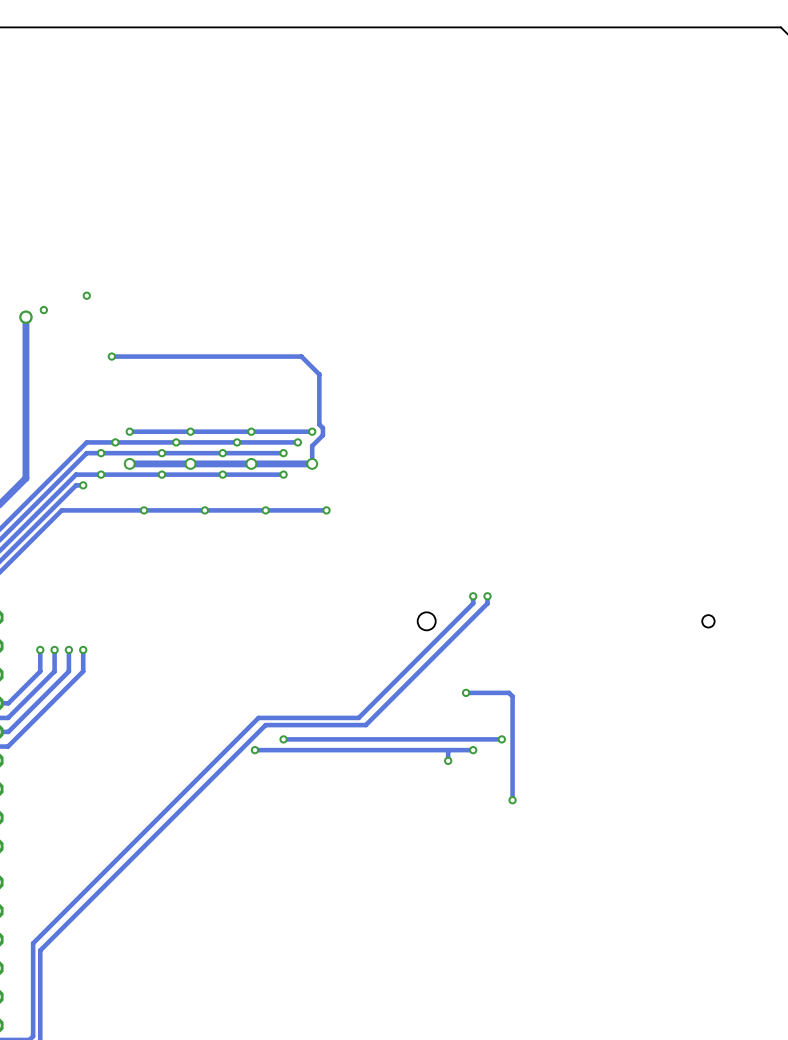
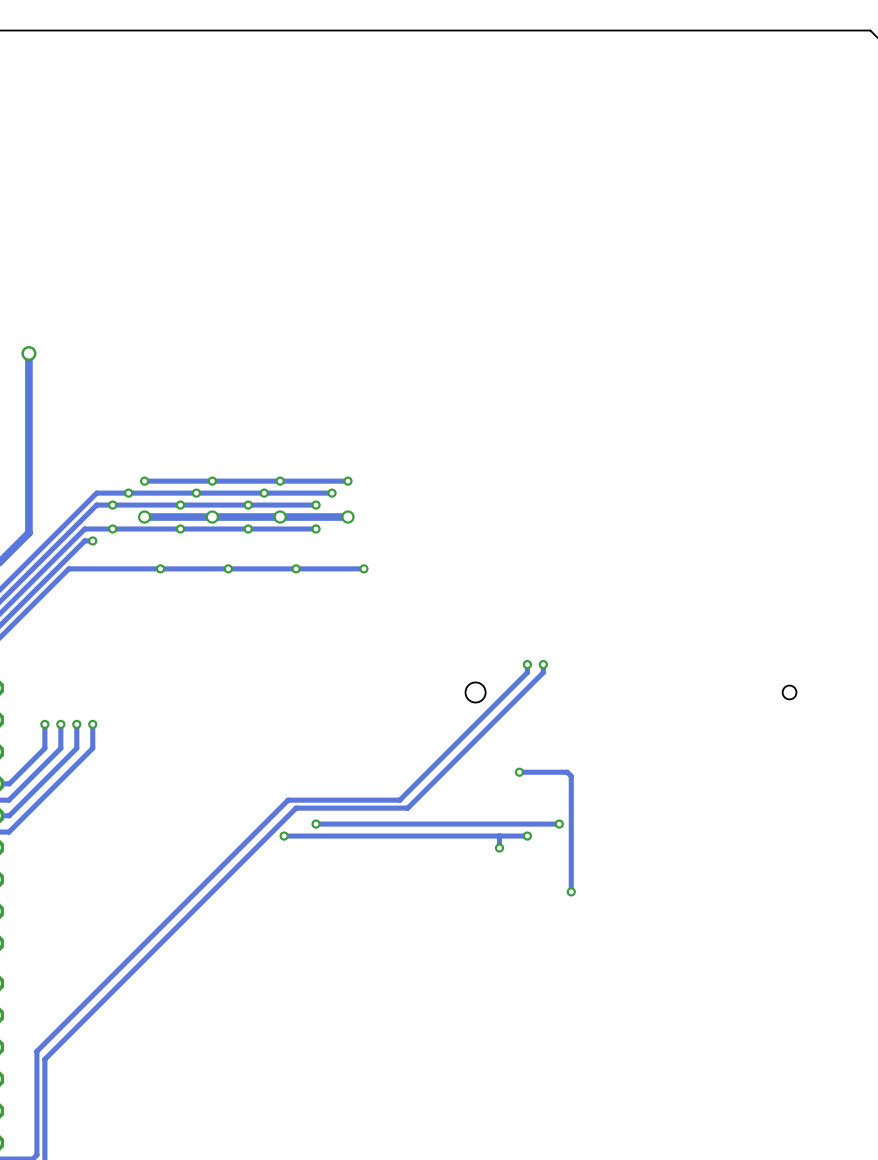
via: (86, 295) -> none
via: (43, 310) -> none
track: (111, 356) (301, 356) (319, 374) (319, 424) (322, 428) (322, 435) (312, 446) (312, 463) -> none
via: (111, 356) -> none

